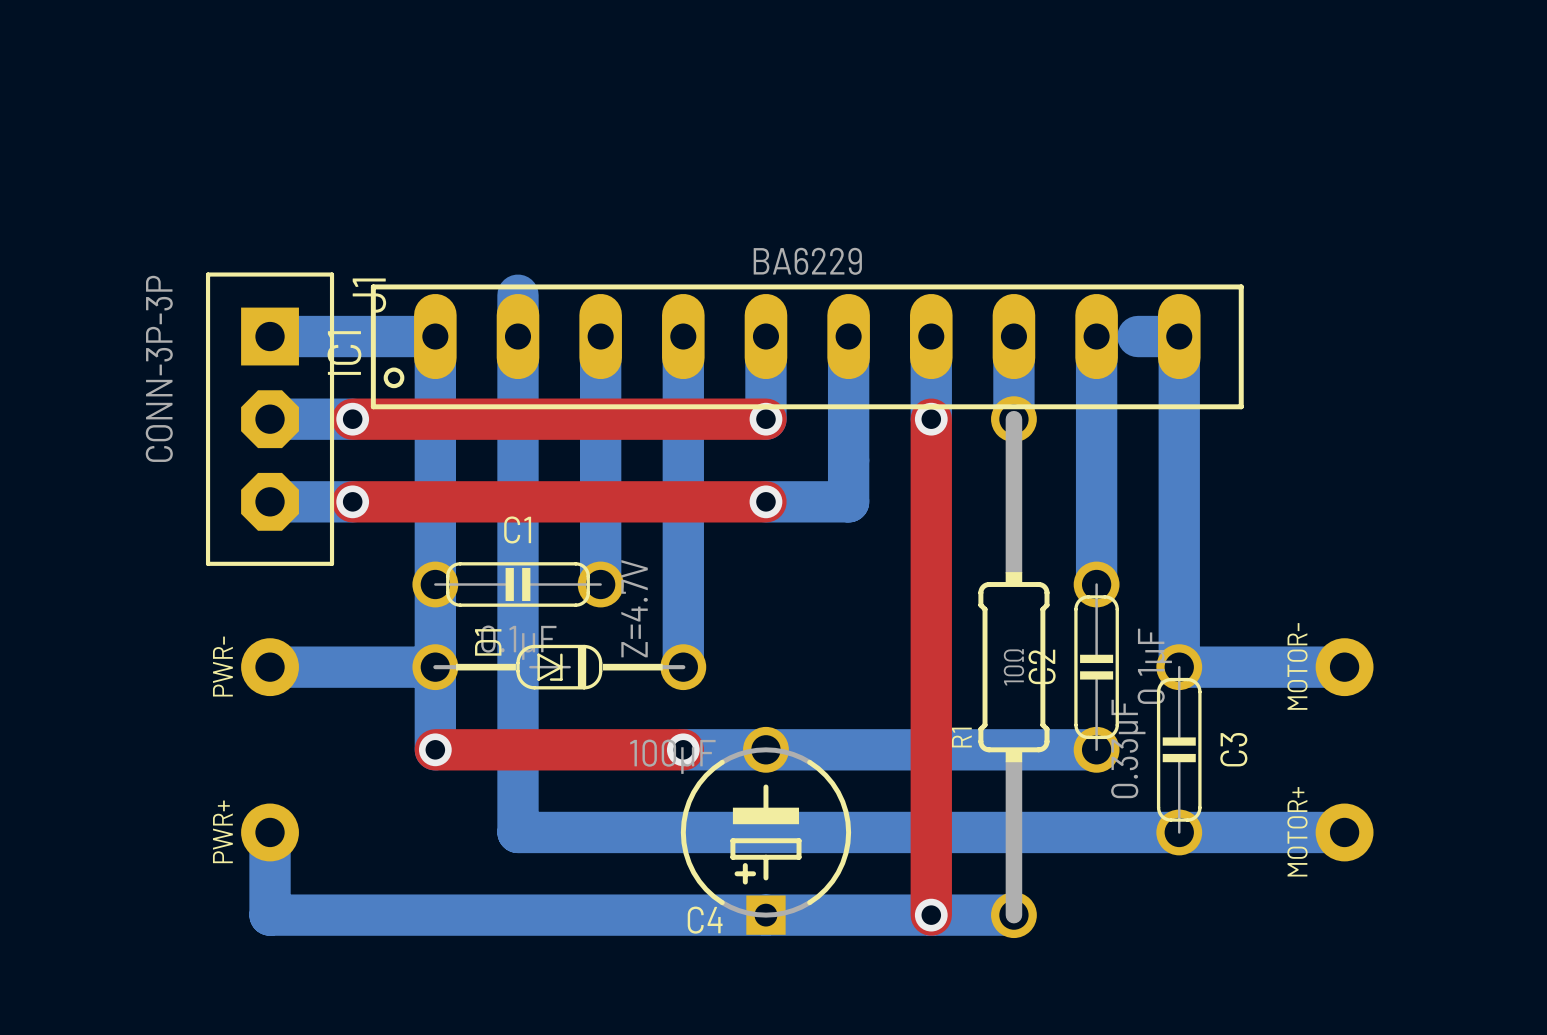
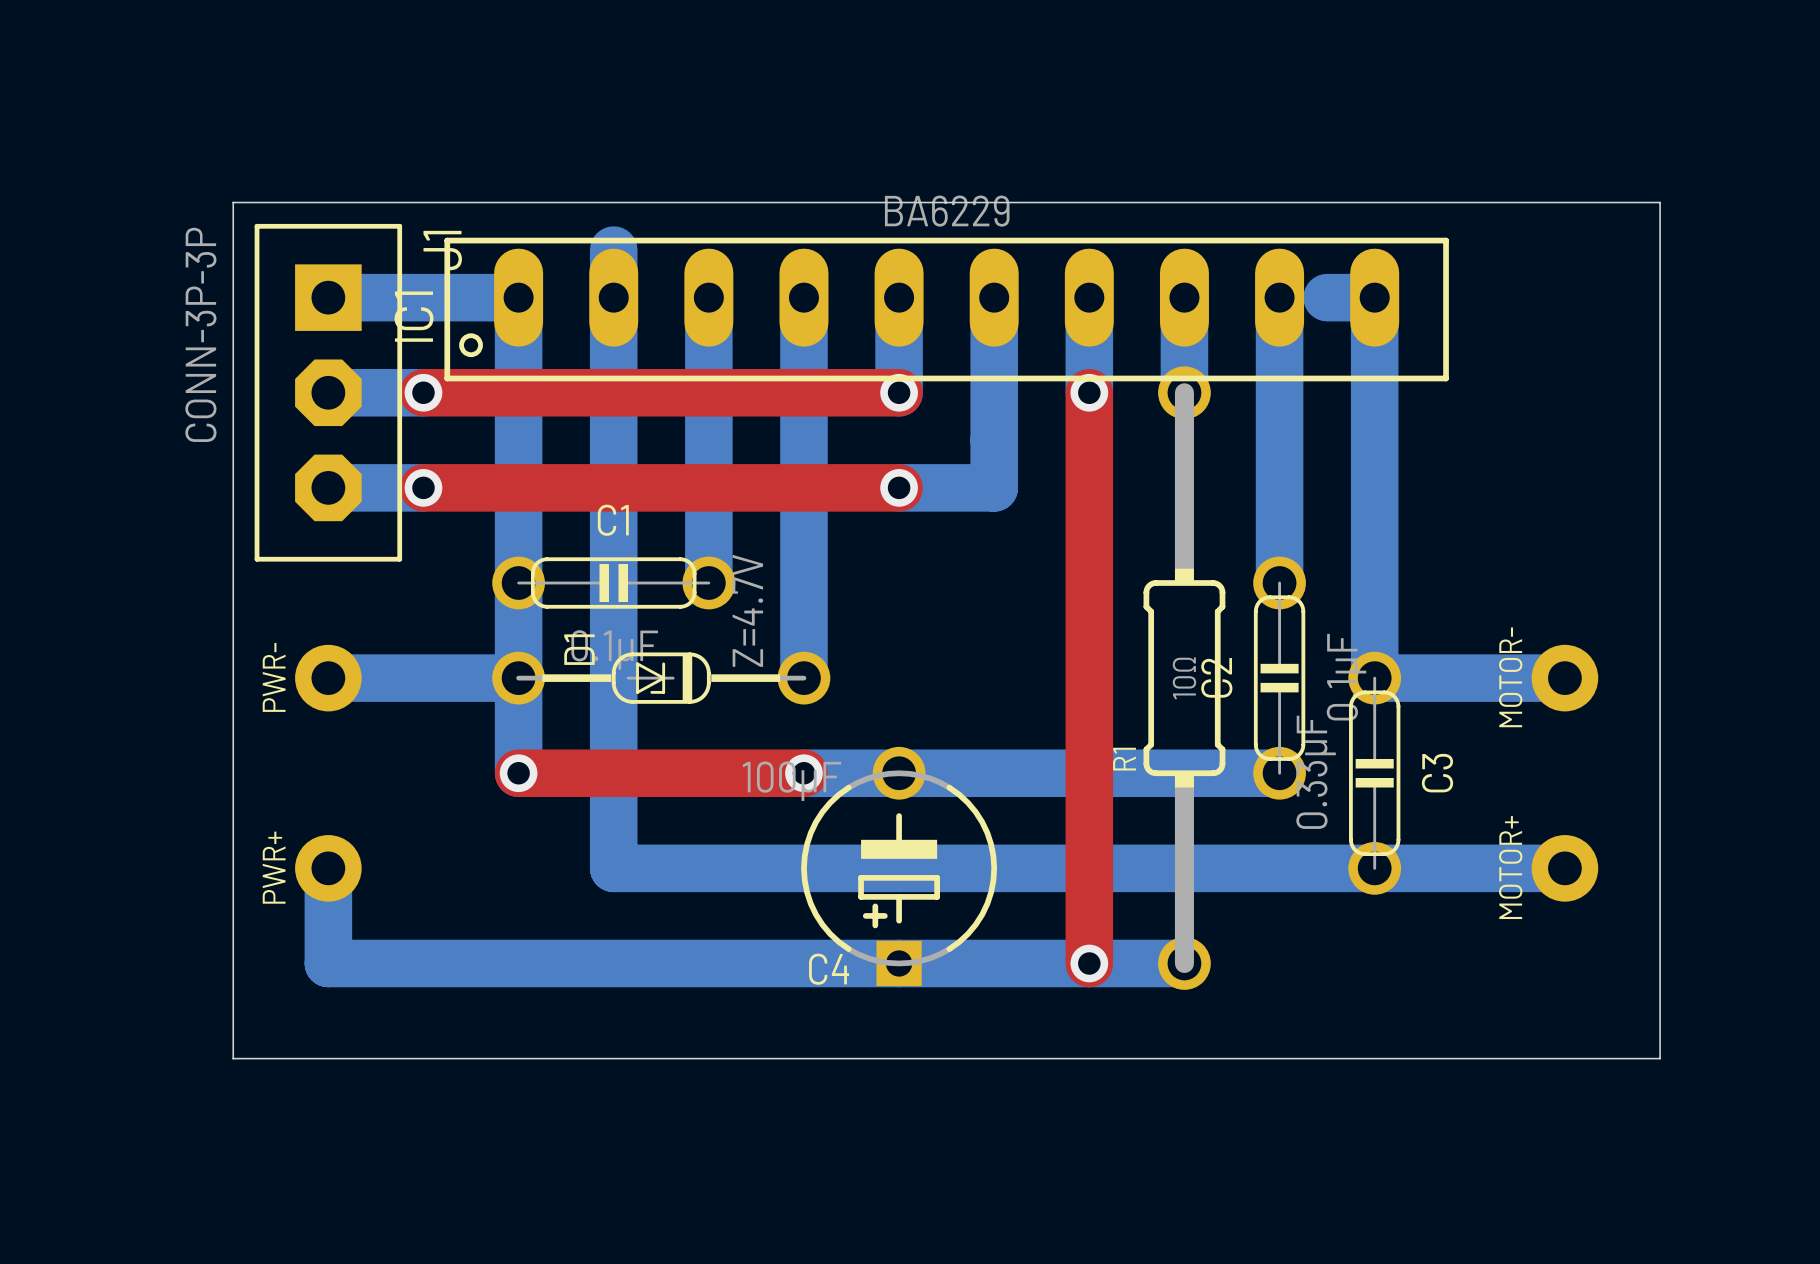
board edge: none -> (233, 202) (1660, 202) (1660, 1058) (233, 1058) (233, 202)

